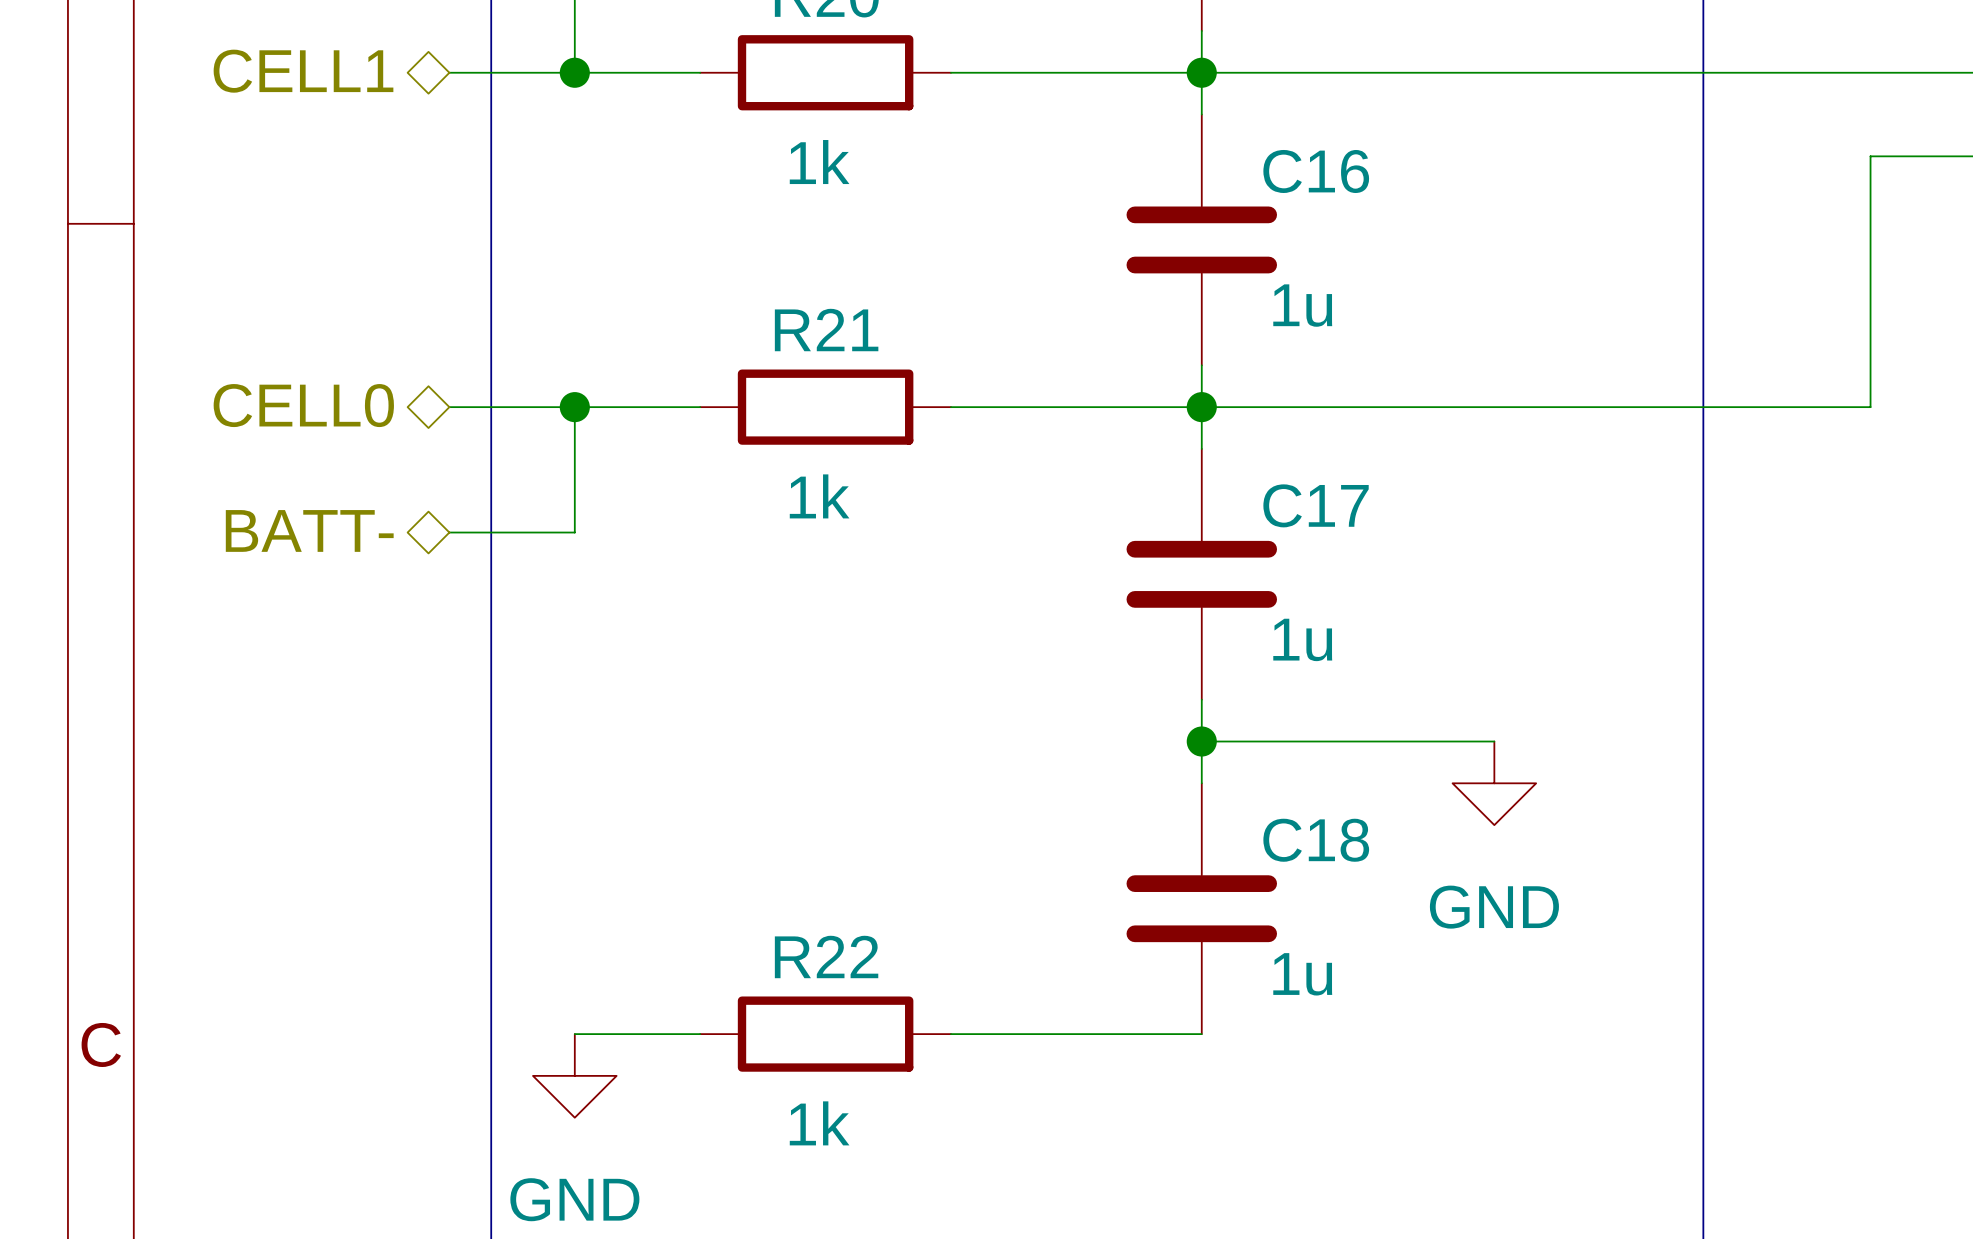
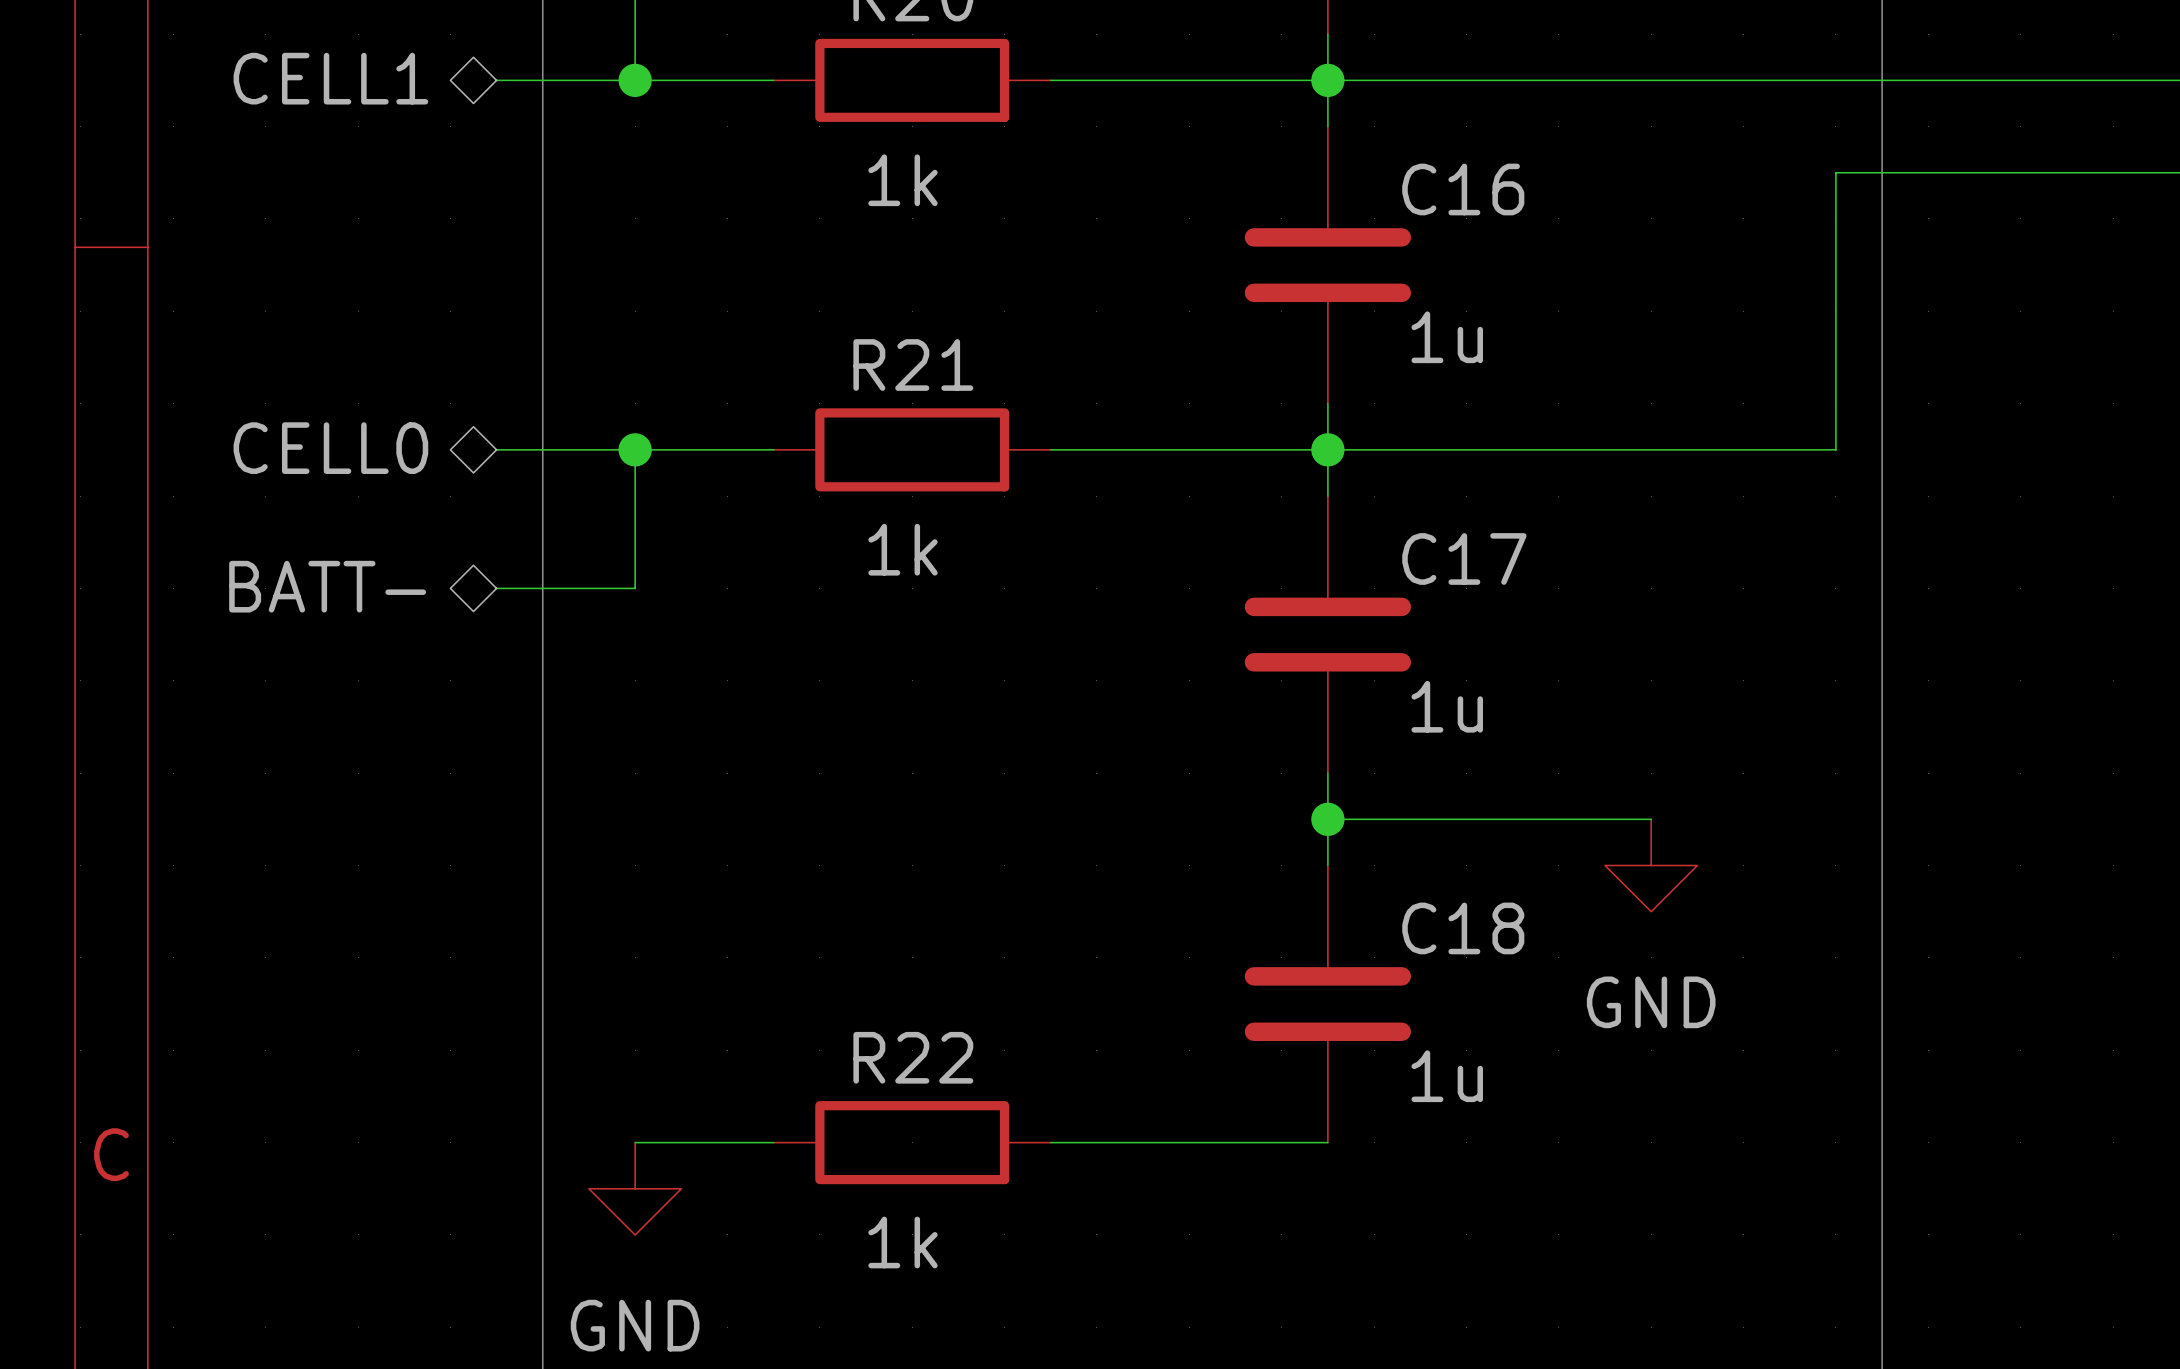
wire: (1870, 156) (1870, 407) (1661, 407) -> (2066, 172) (1835, 172) (1835, 449)

